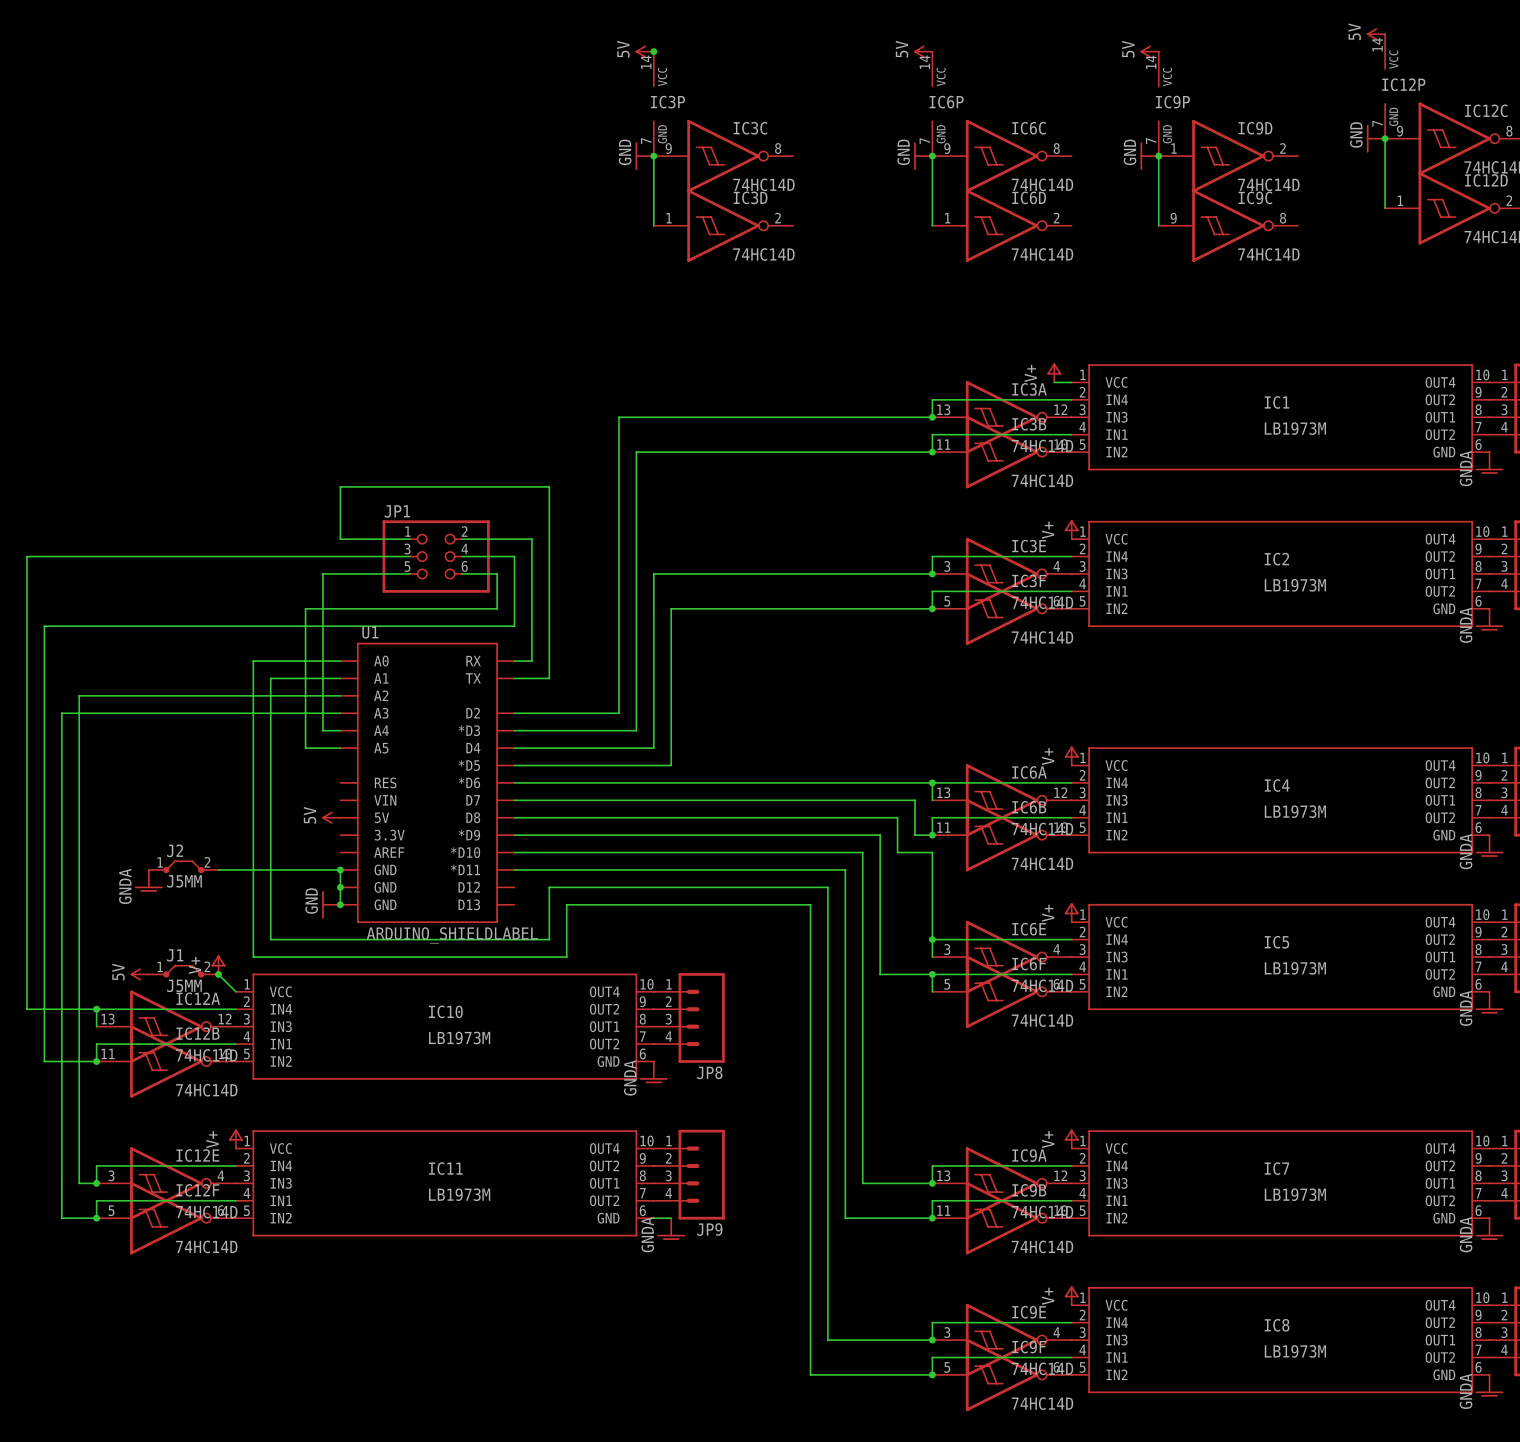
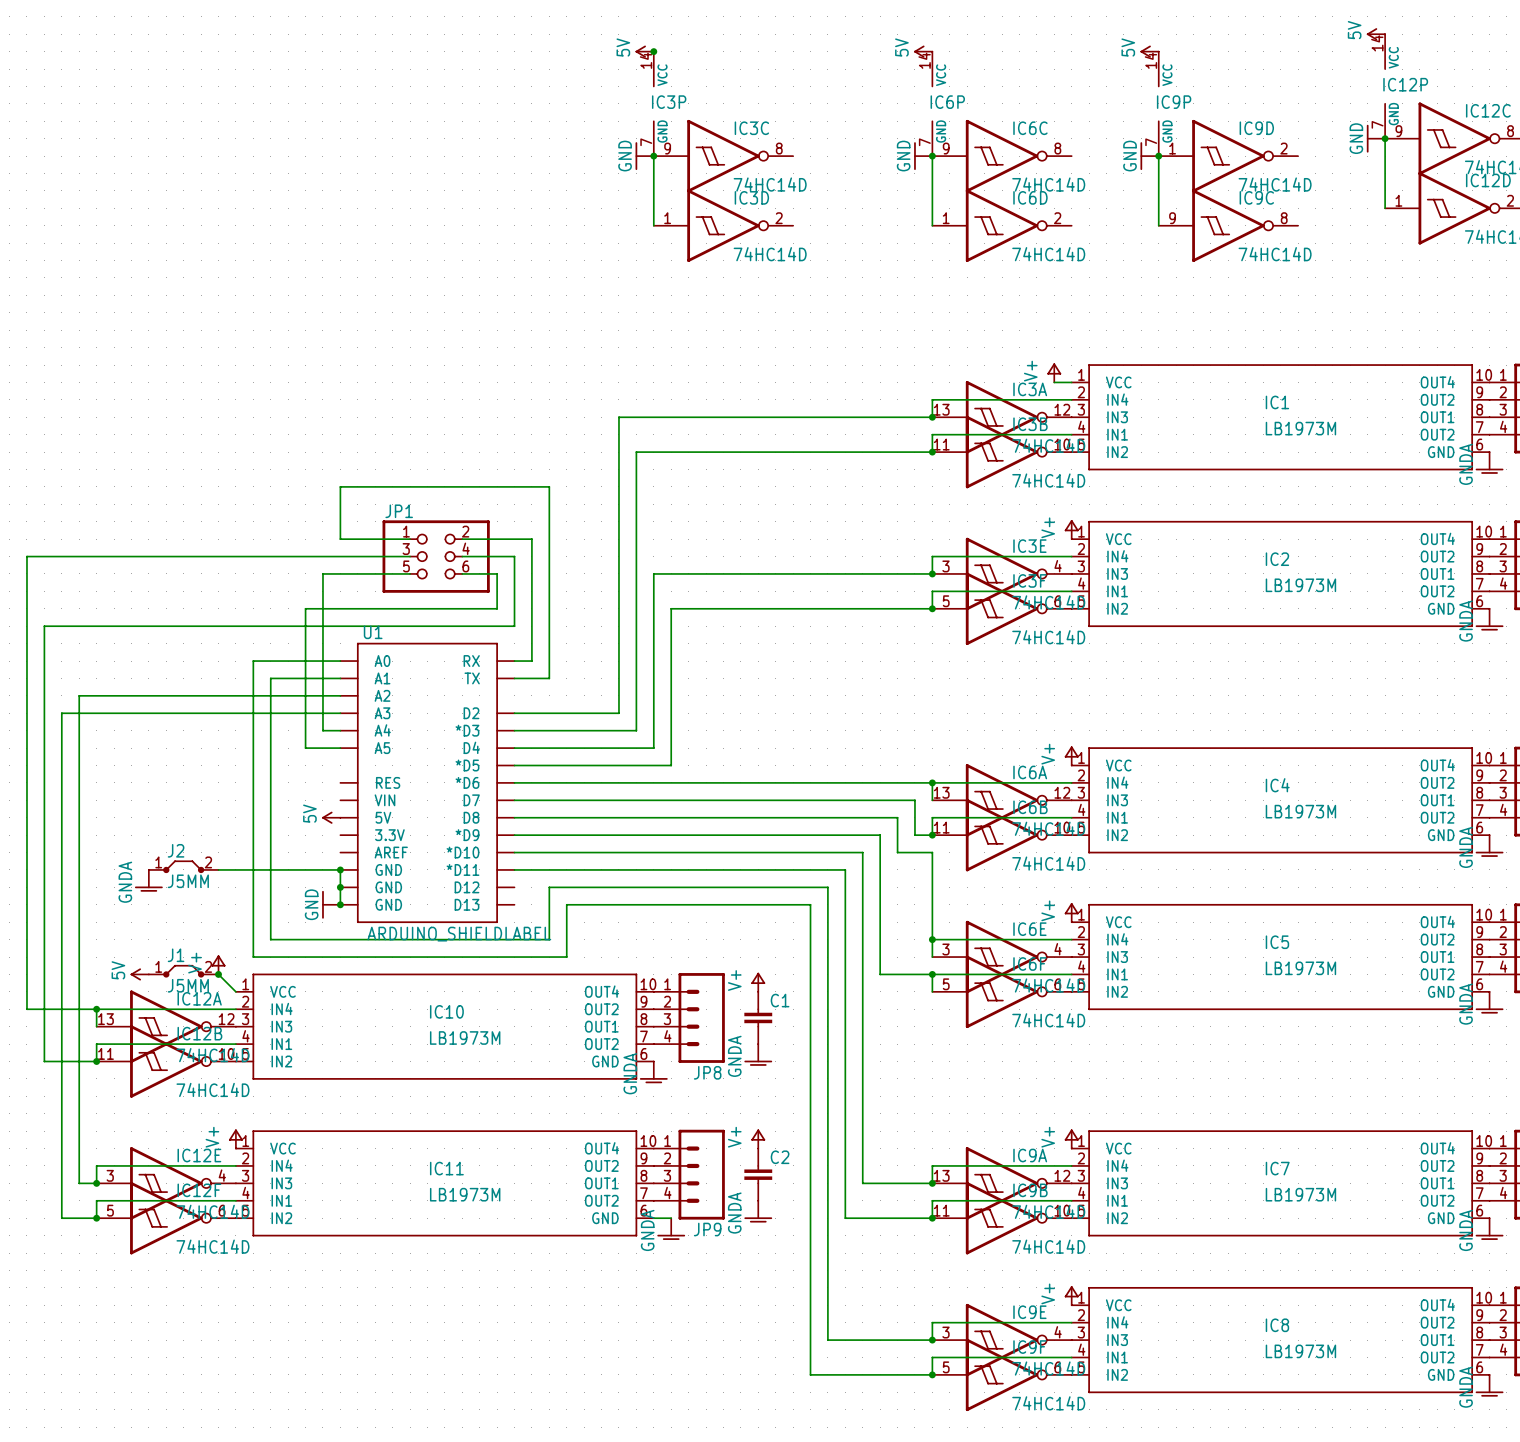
power symbol: none -> V+ (758, 982)
C1: none -> (758, 1017)
power symbol: none -> GNDA (758, 1054)
power symbol: none -> V+ (758, 1138)
C2: none -> (758, 1174)
power symbol: none -> GNDA (758, 1211)

